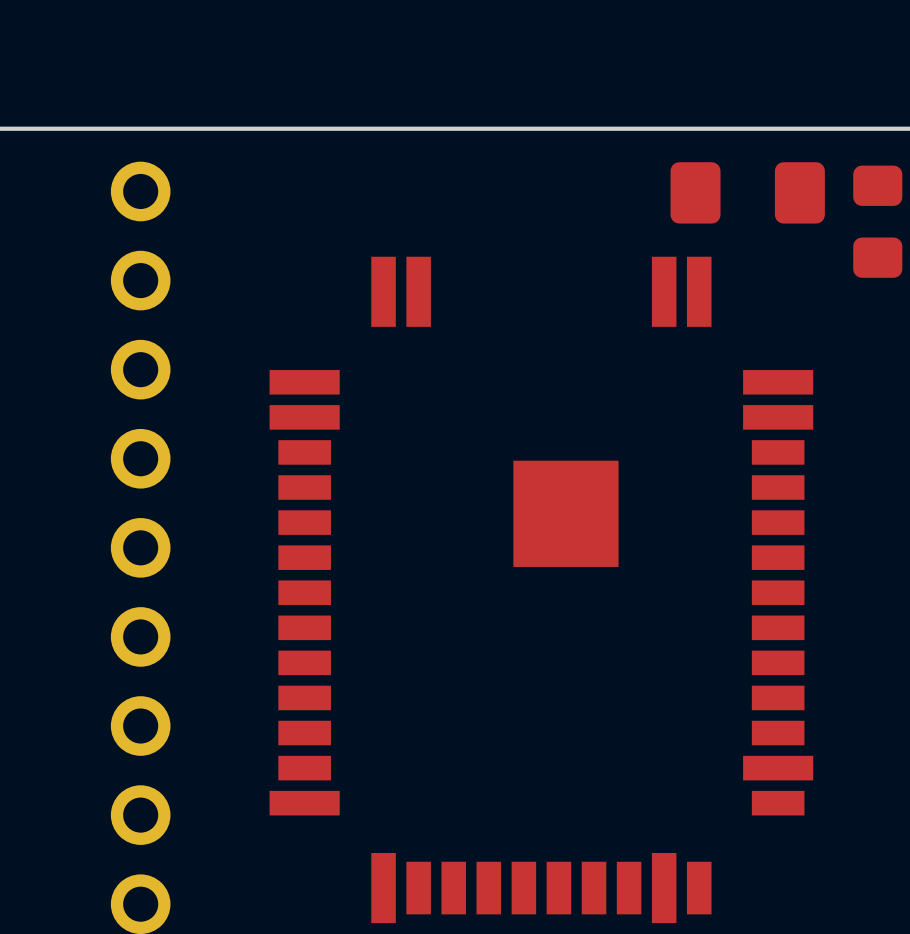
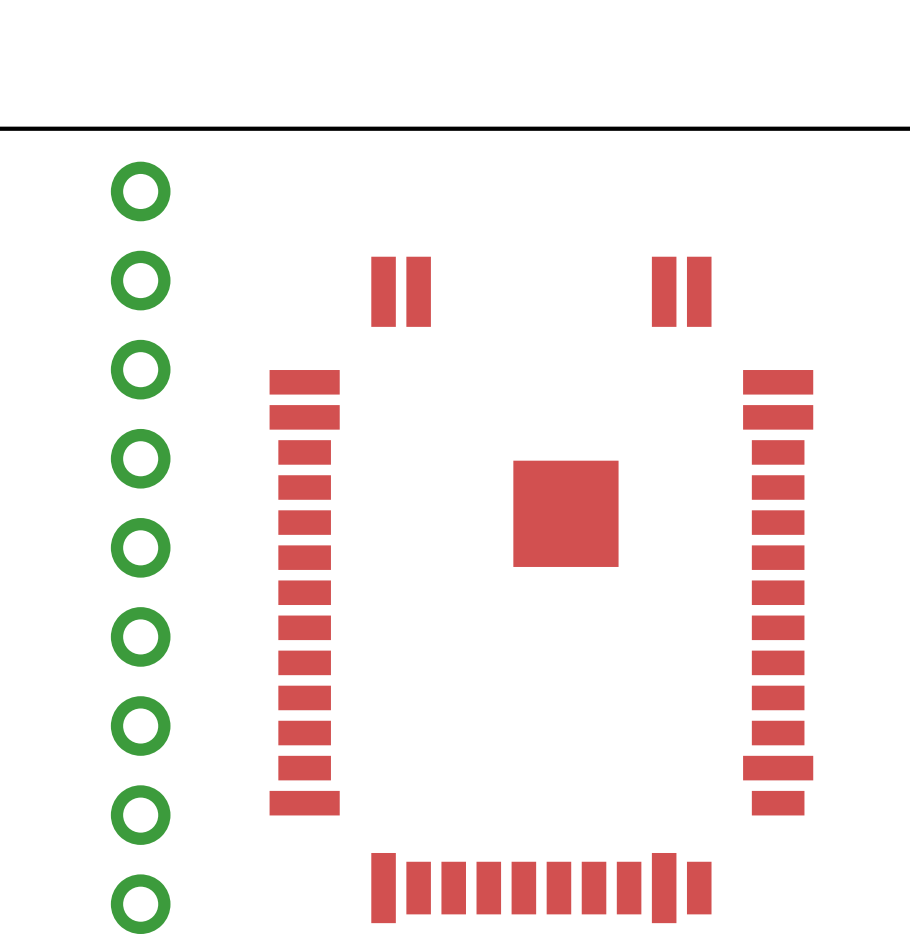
part: (747, 192) -> none
part: (877, 221) -> none

